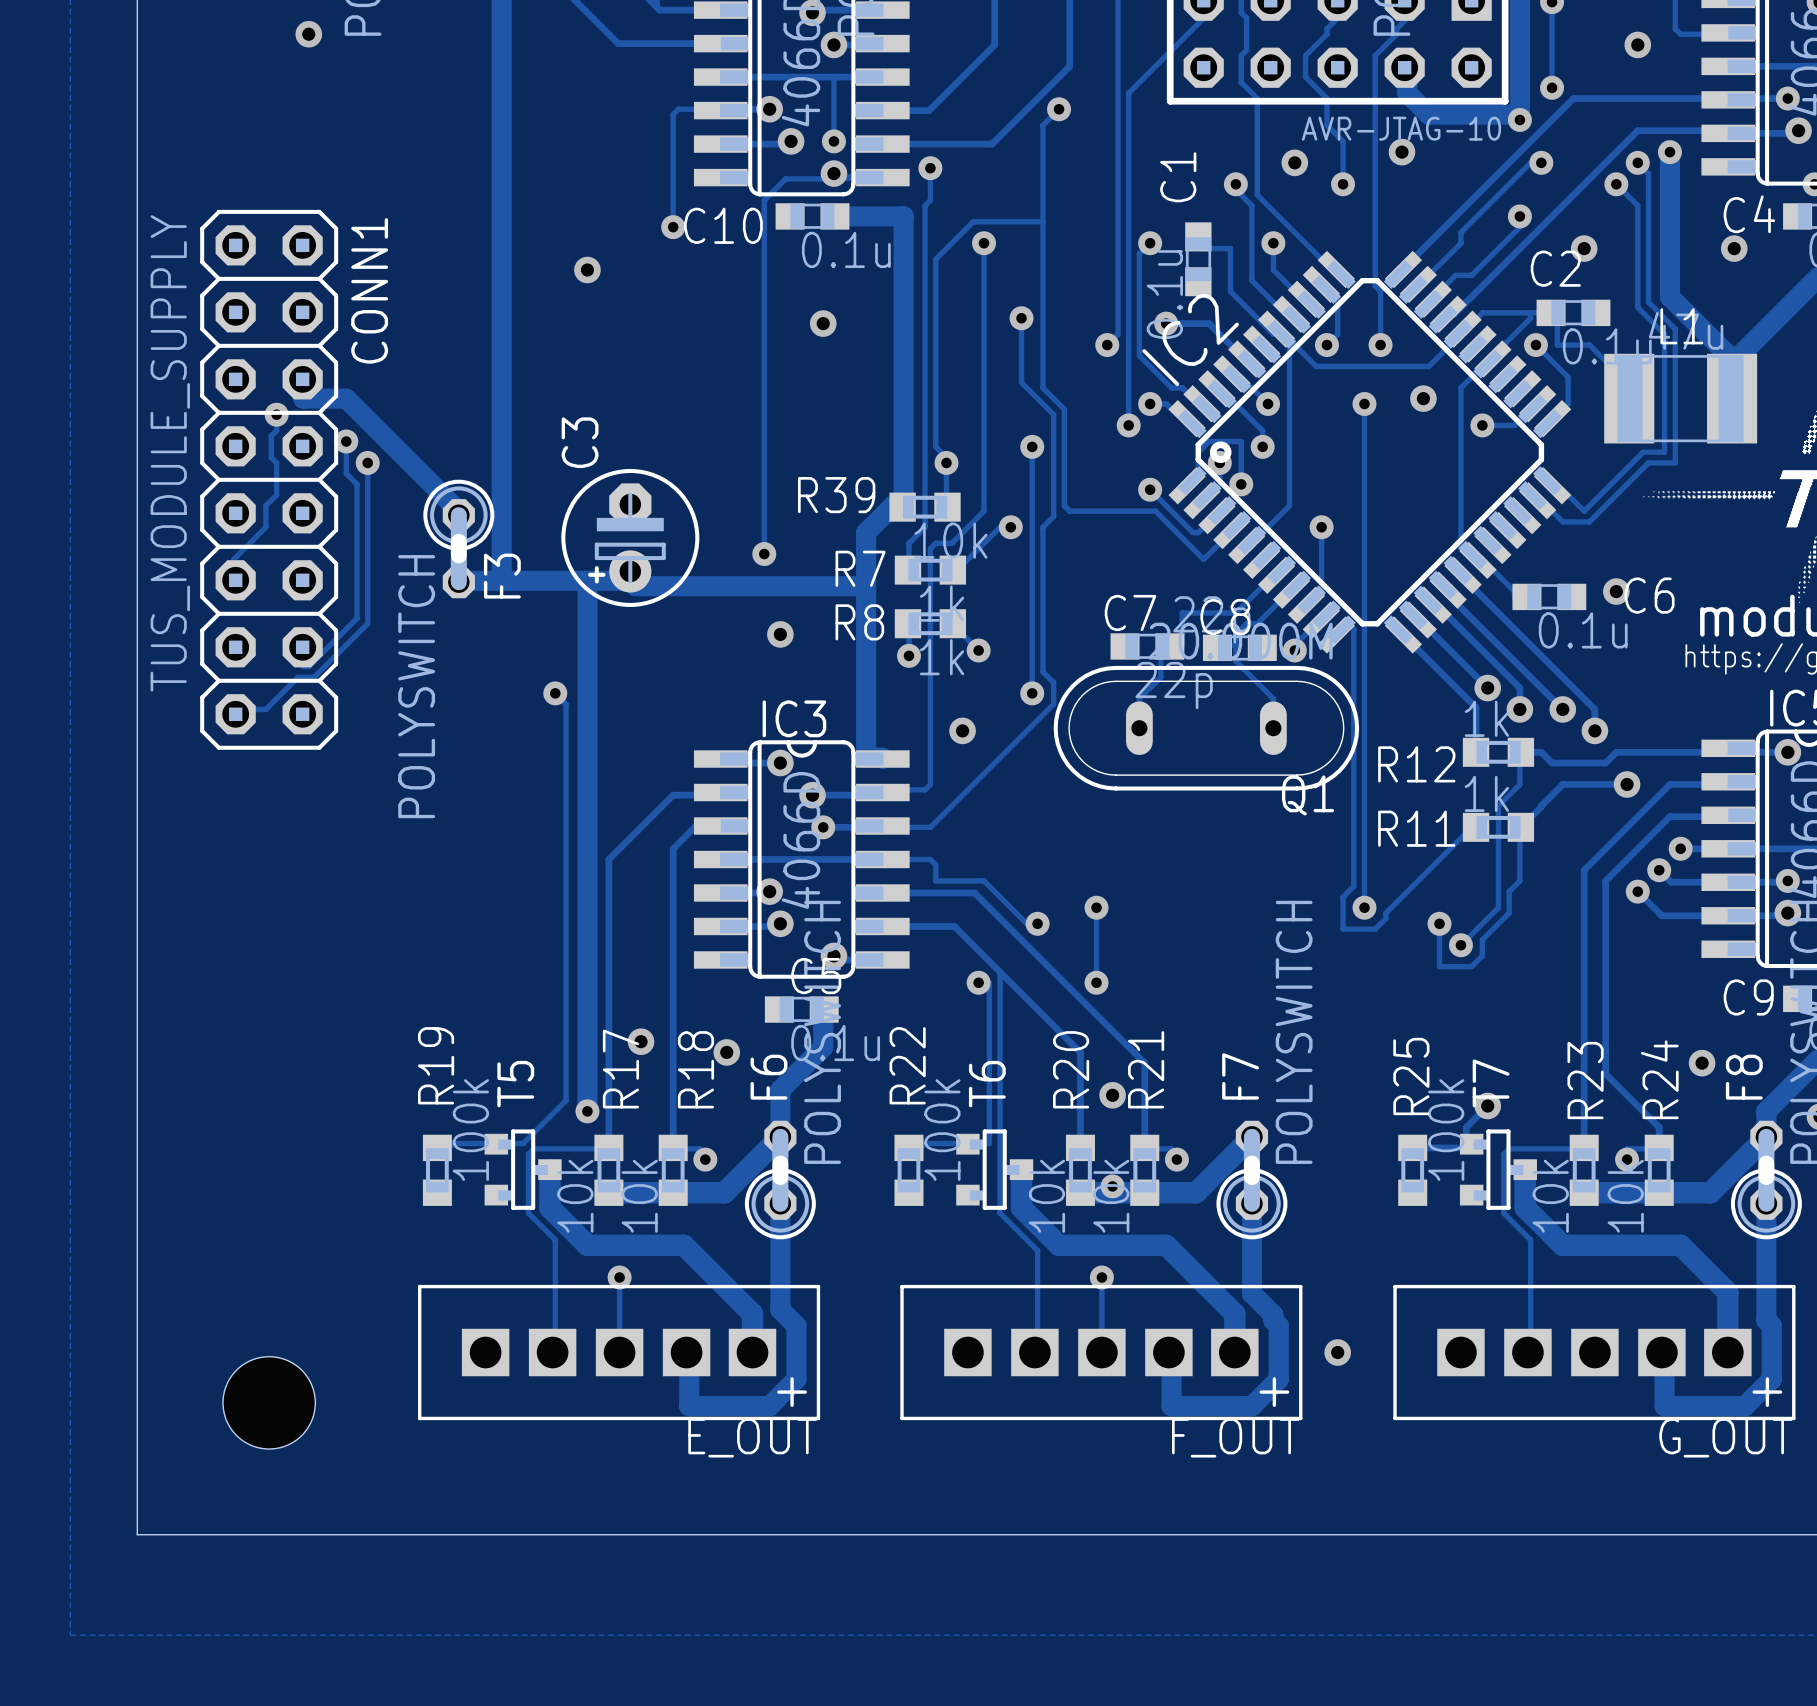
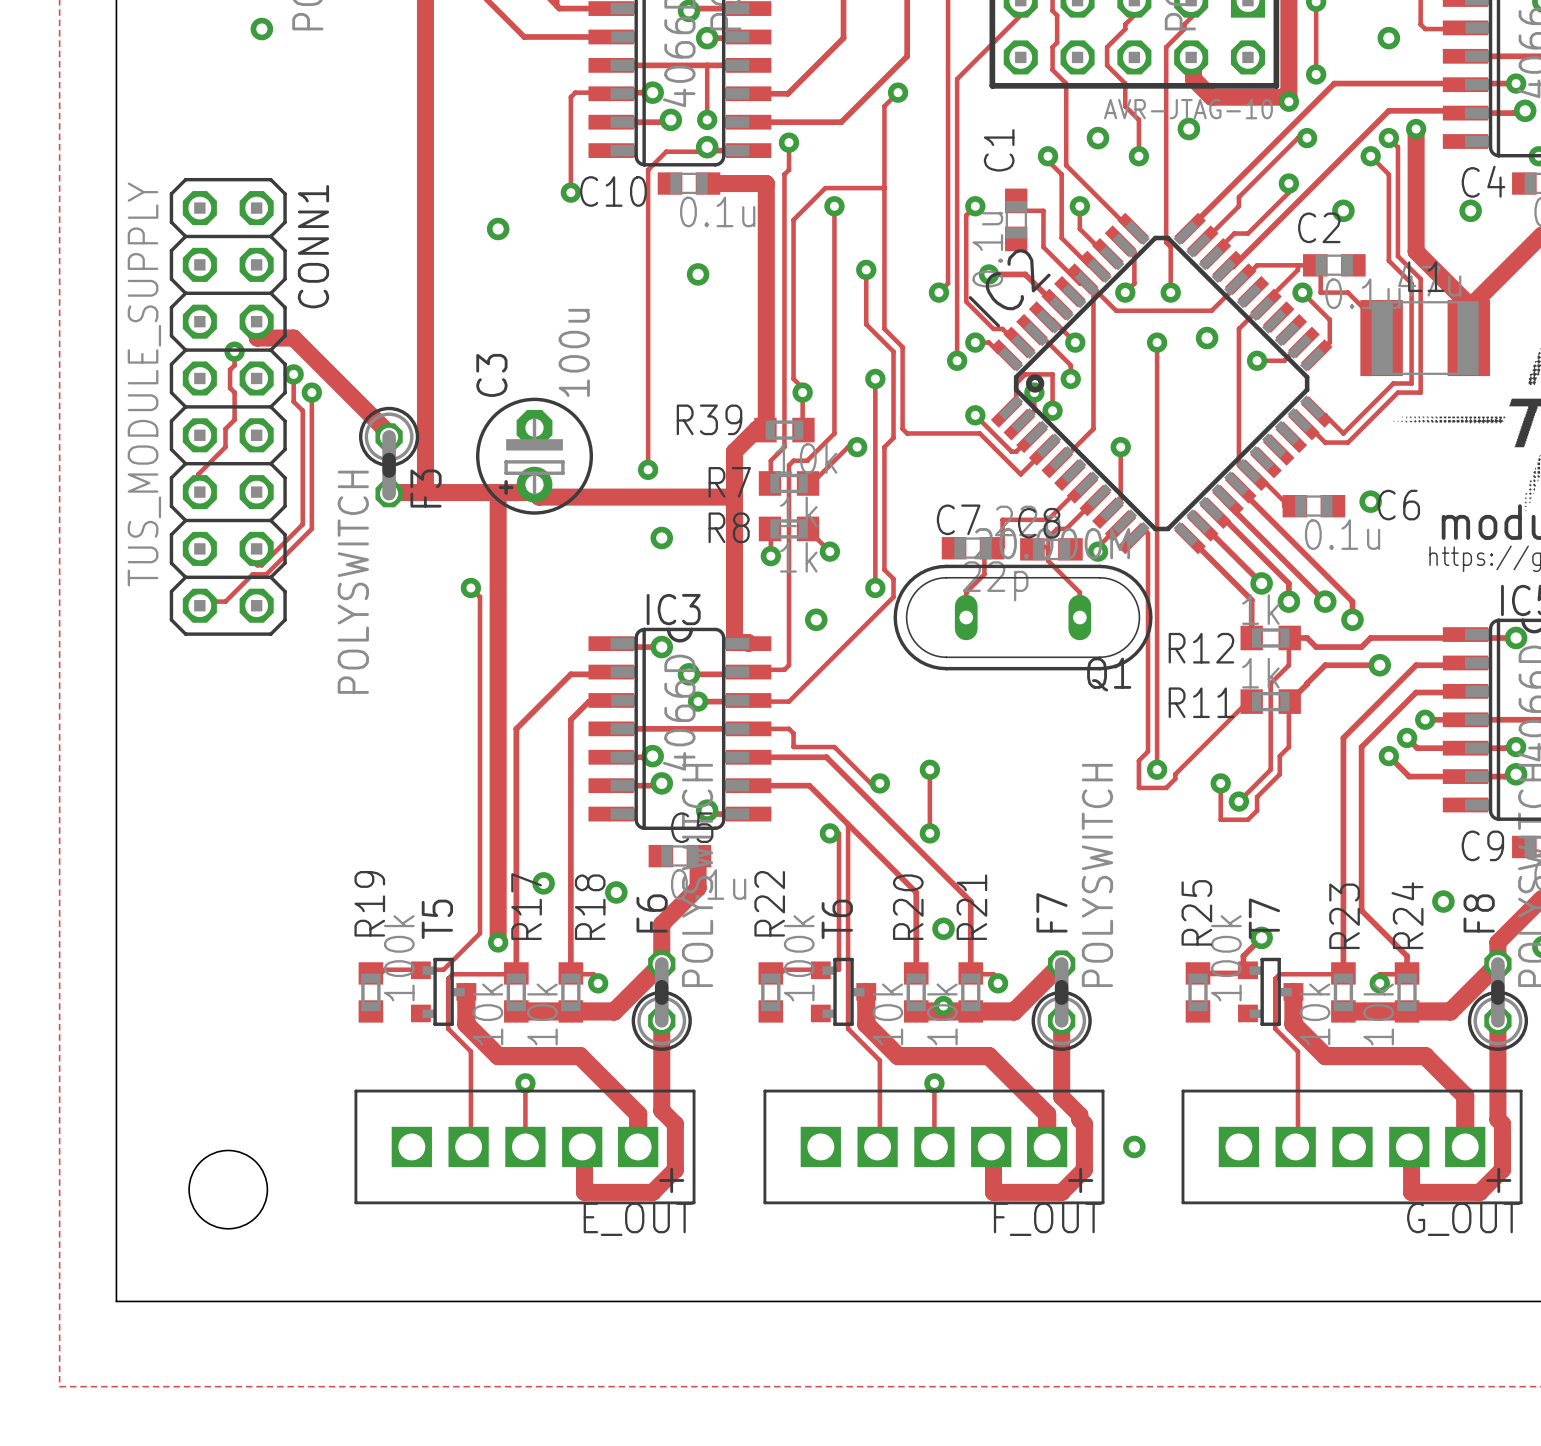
C3 value: none -> 100u (574, 352)

